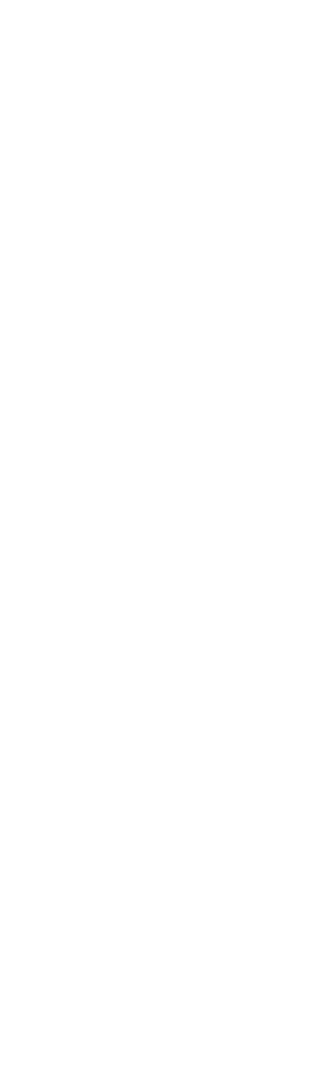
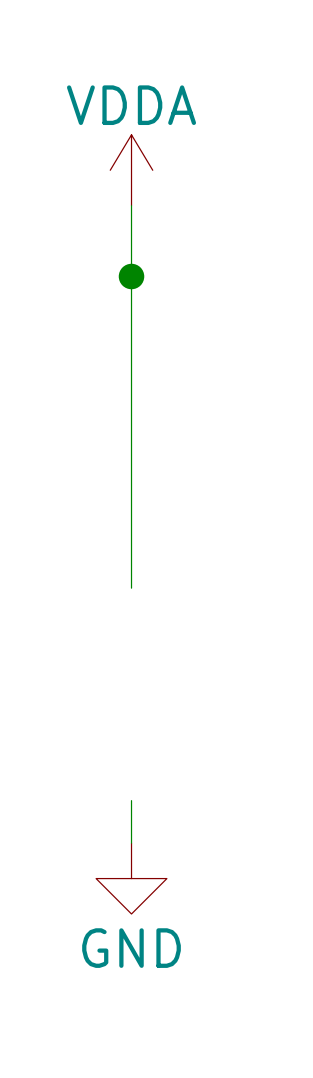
power symbol: none -> VDDA (131, 170)
wire: none -> (131, 205) (131, 588)
junction: none -> (131, 276)
wire: none -> (131, 800) (131, 843)
power symbol: none -> GND (131, 878)

